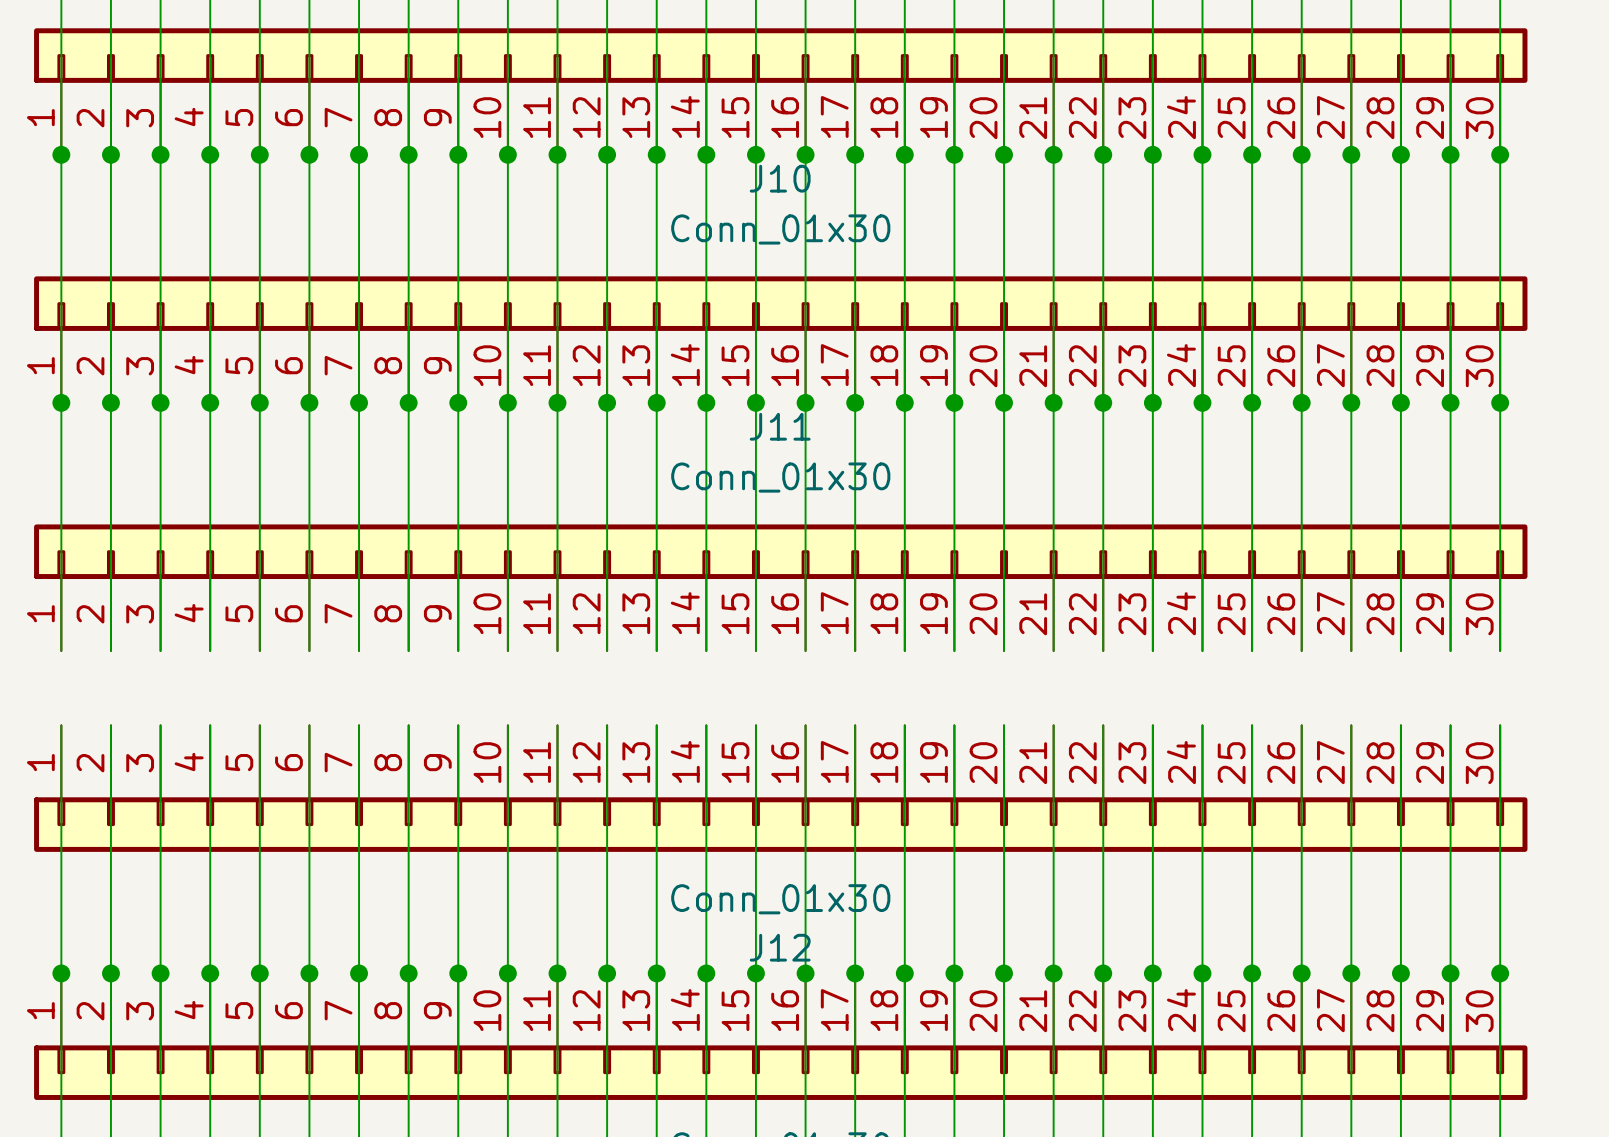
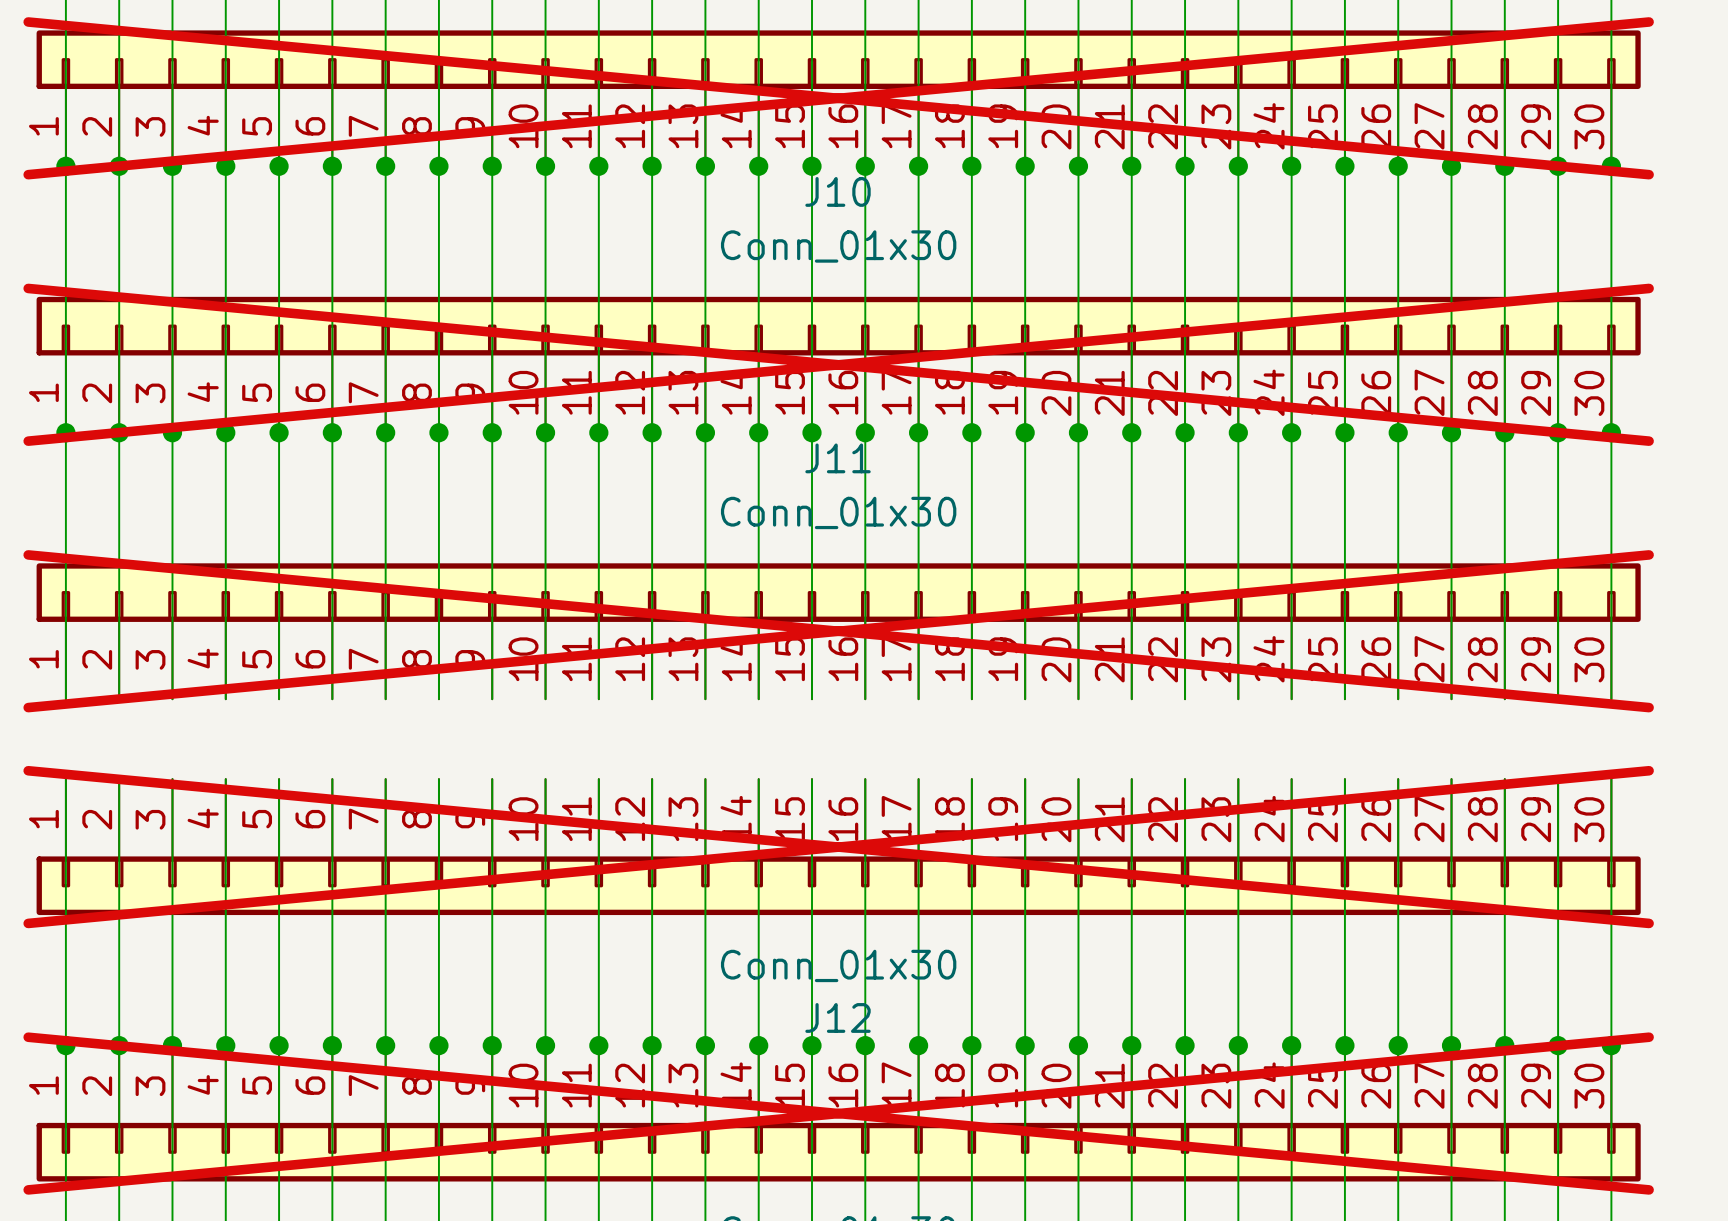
part do-not-place cross: none -> (838, 98)
J10 do-not-place cross: none -> (838, 364)
J11 do-not-place cross: none -> (838, 631)
J12 do-not-place cross: none -> (838, 847)
part do-not-place cross: none -> (838, 1113)

